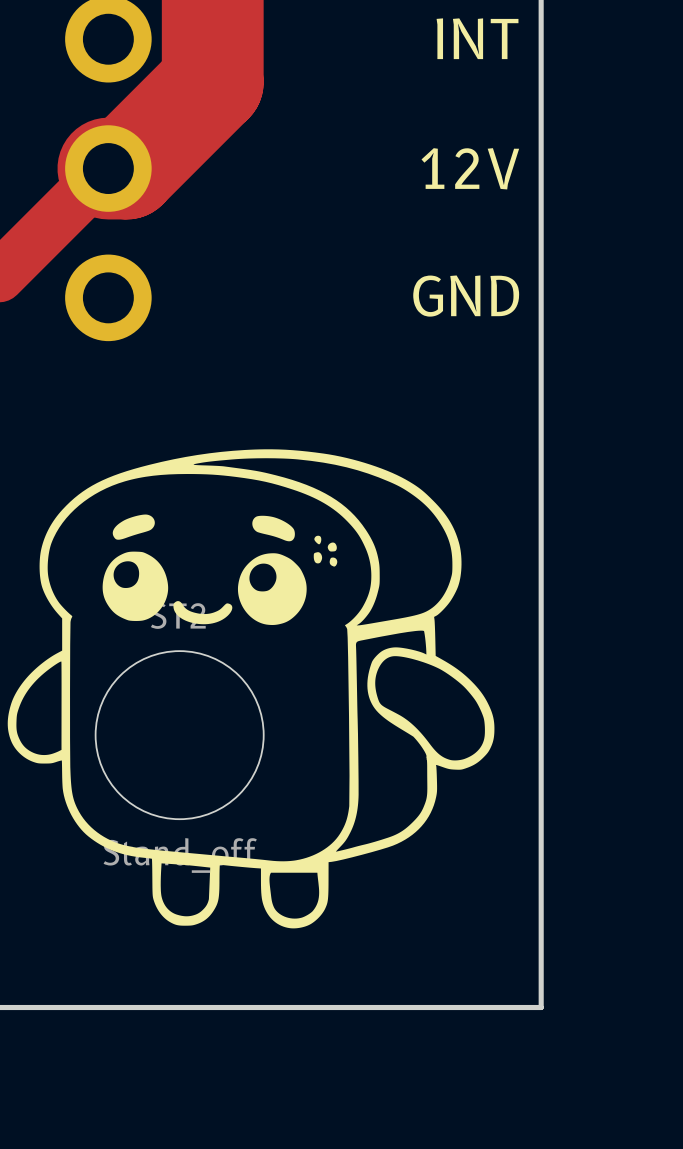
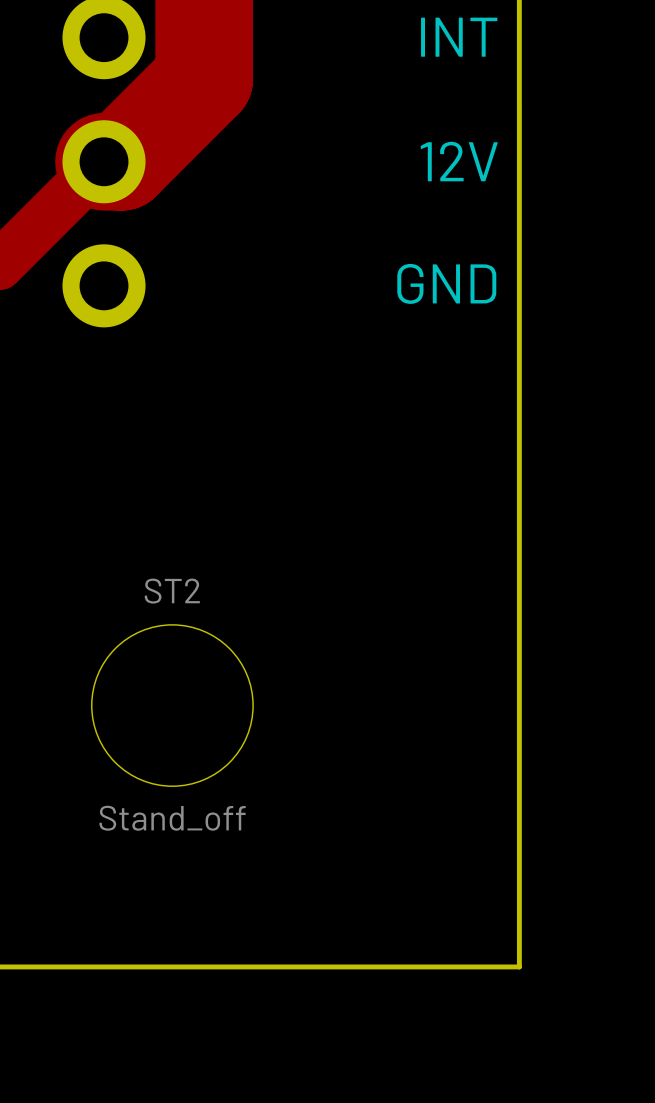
drawing: [7, 449, 495, 929] -> none

